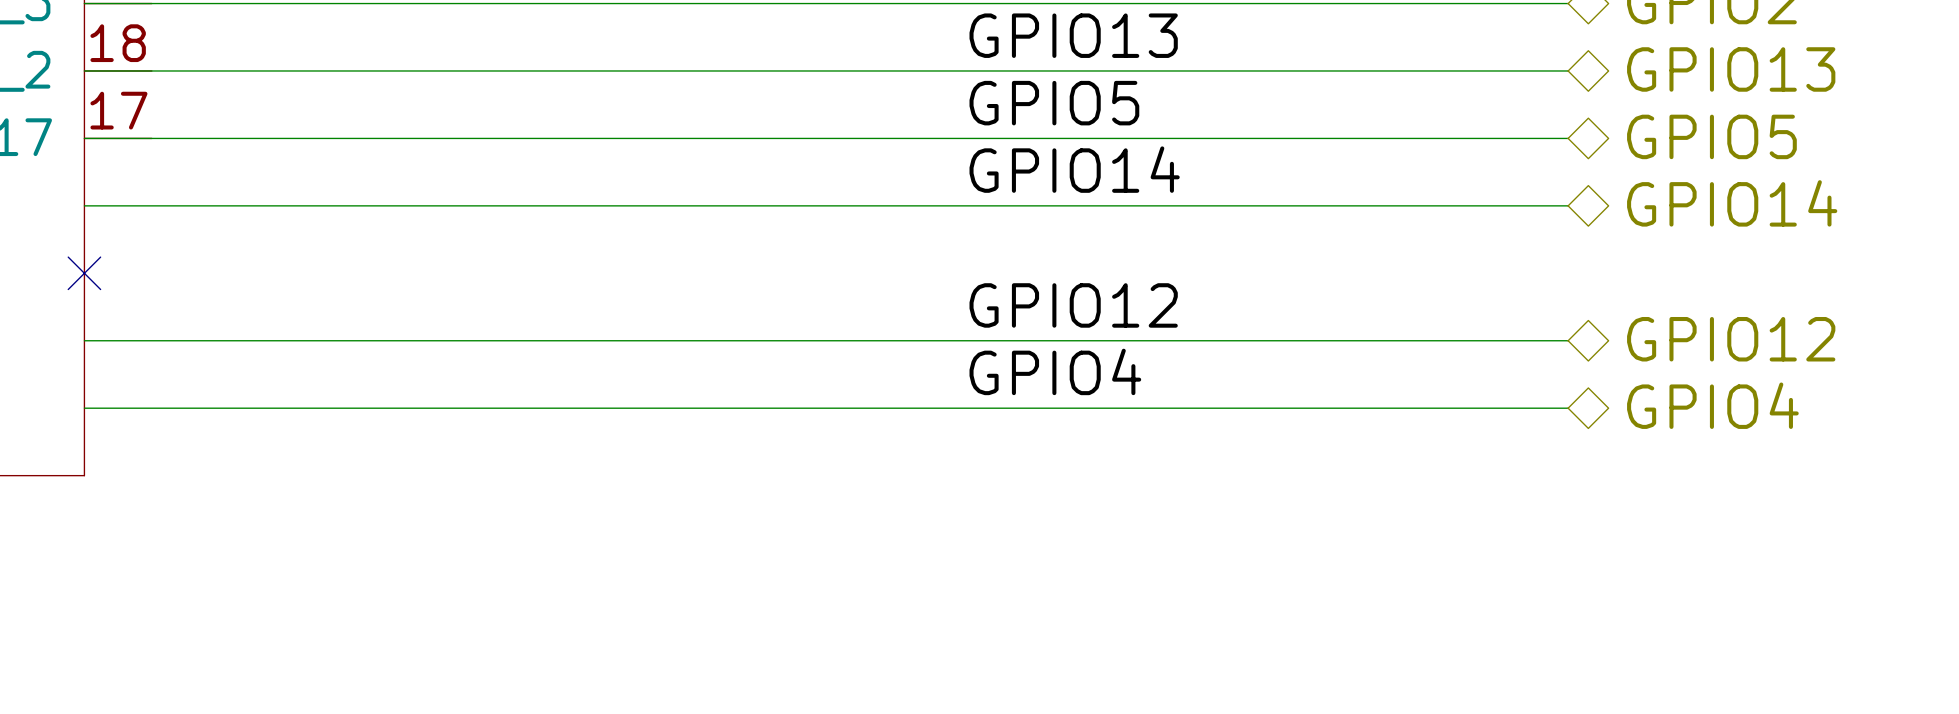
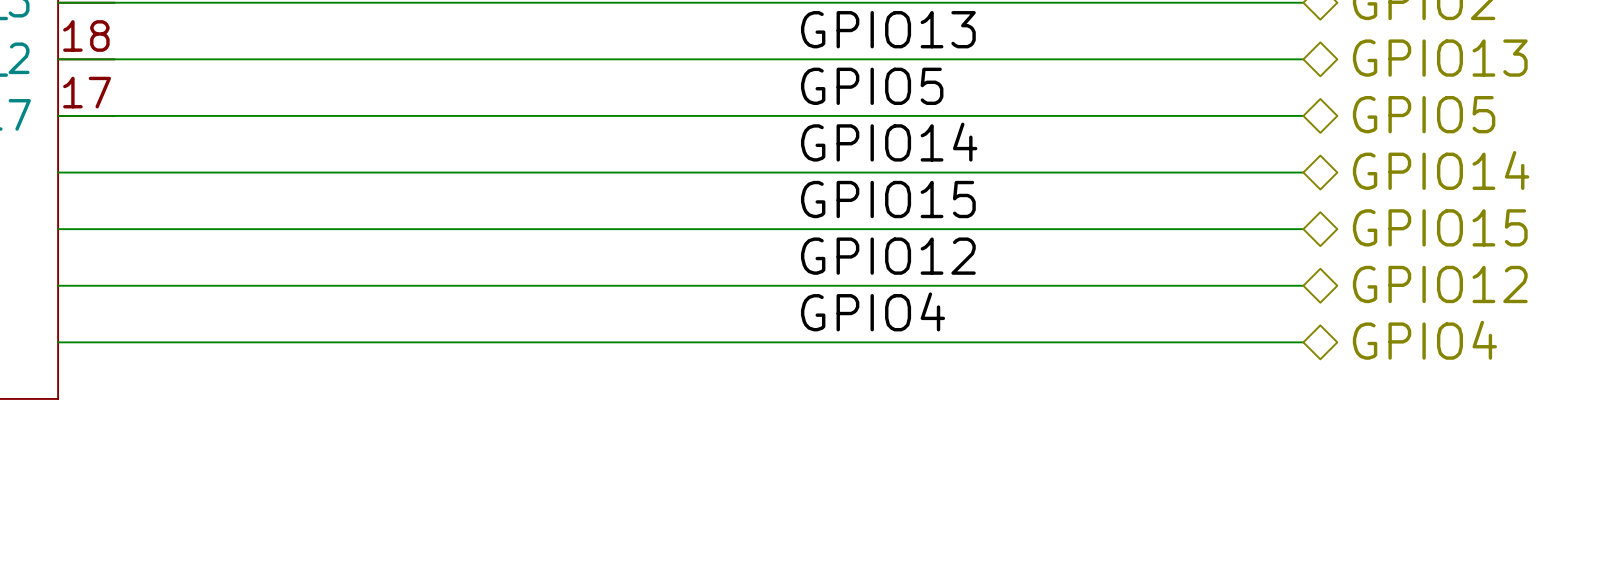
label: none -> GPIO15 (888, 199)
hierarchical label: none -> GPIO15 (1440, 227)
wire: none -> (58, 229) (1303, 229)
no-connect mark: (84, 273) -> none

